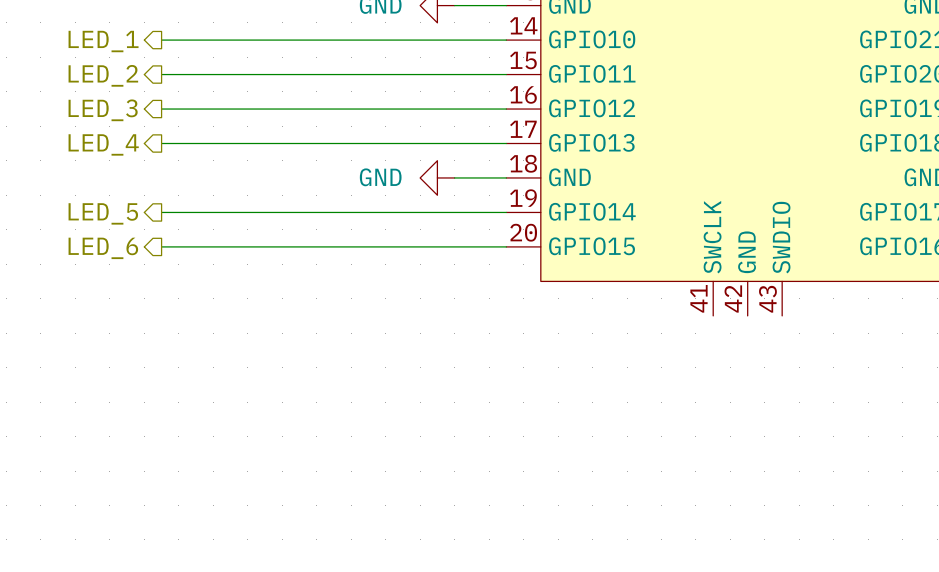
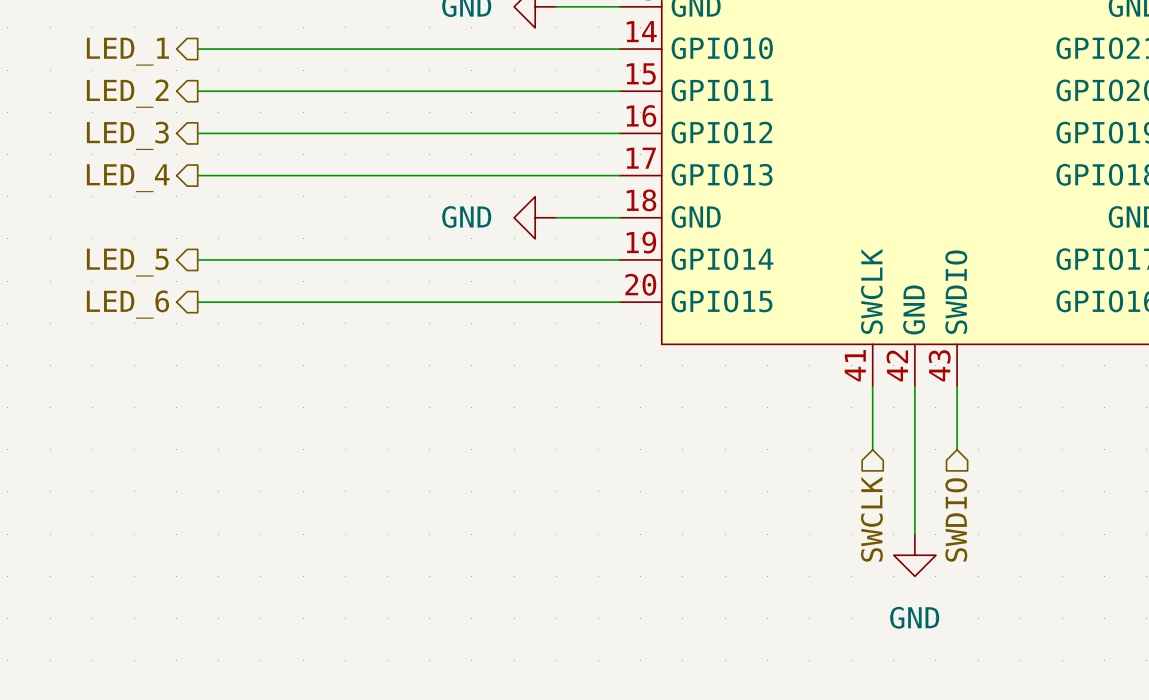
wire: none -> (872, 386) (872, 449)
wire: none -> (914, 386) (914, 534)
wire: none -> (957, 386) (957, 449)
hierarchical label: none -> SWCLK (871, 519)
hierarchical label: none -> SWDIO (956, 519)
power symbol: none -> GND (914, 555)

